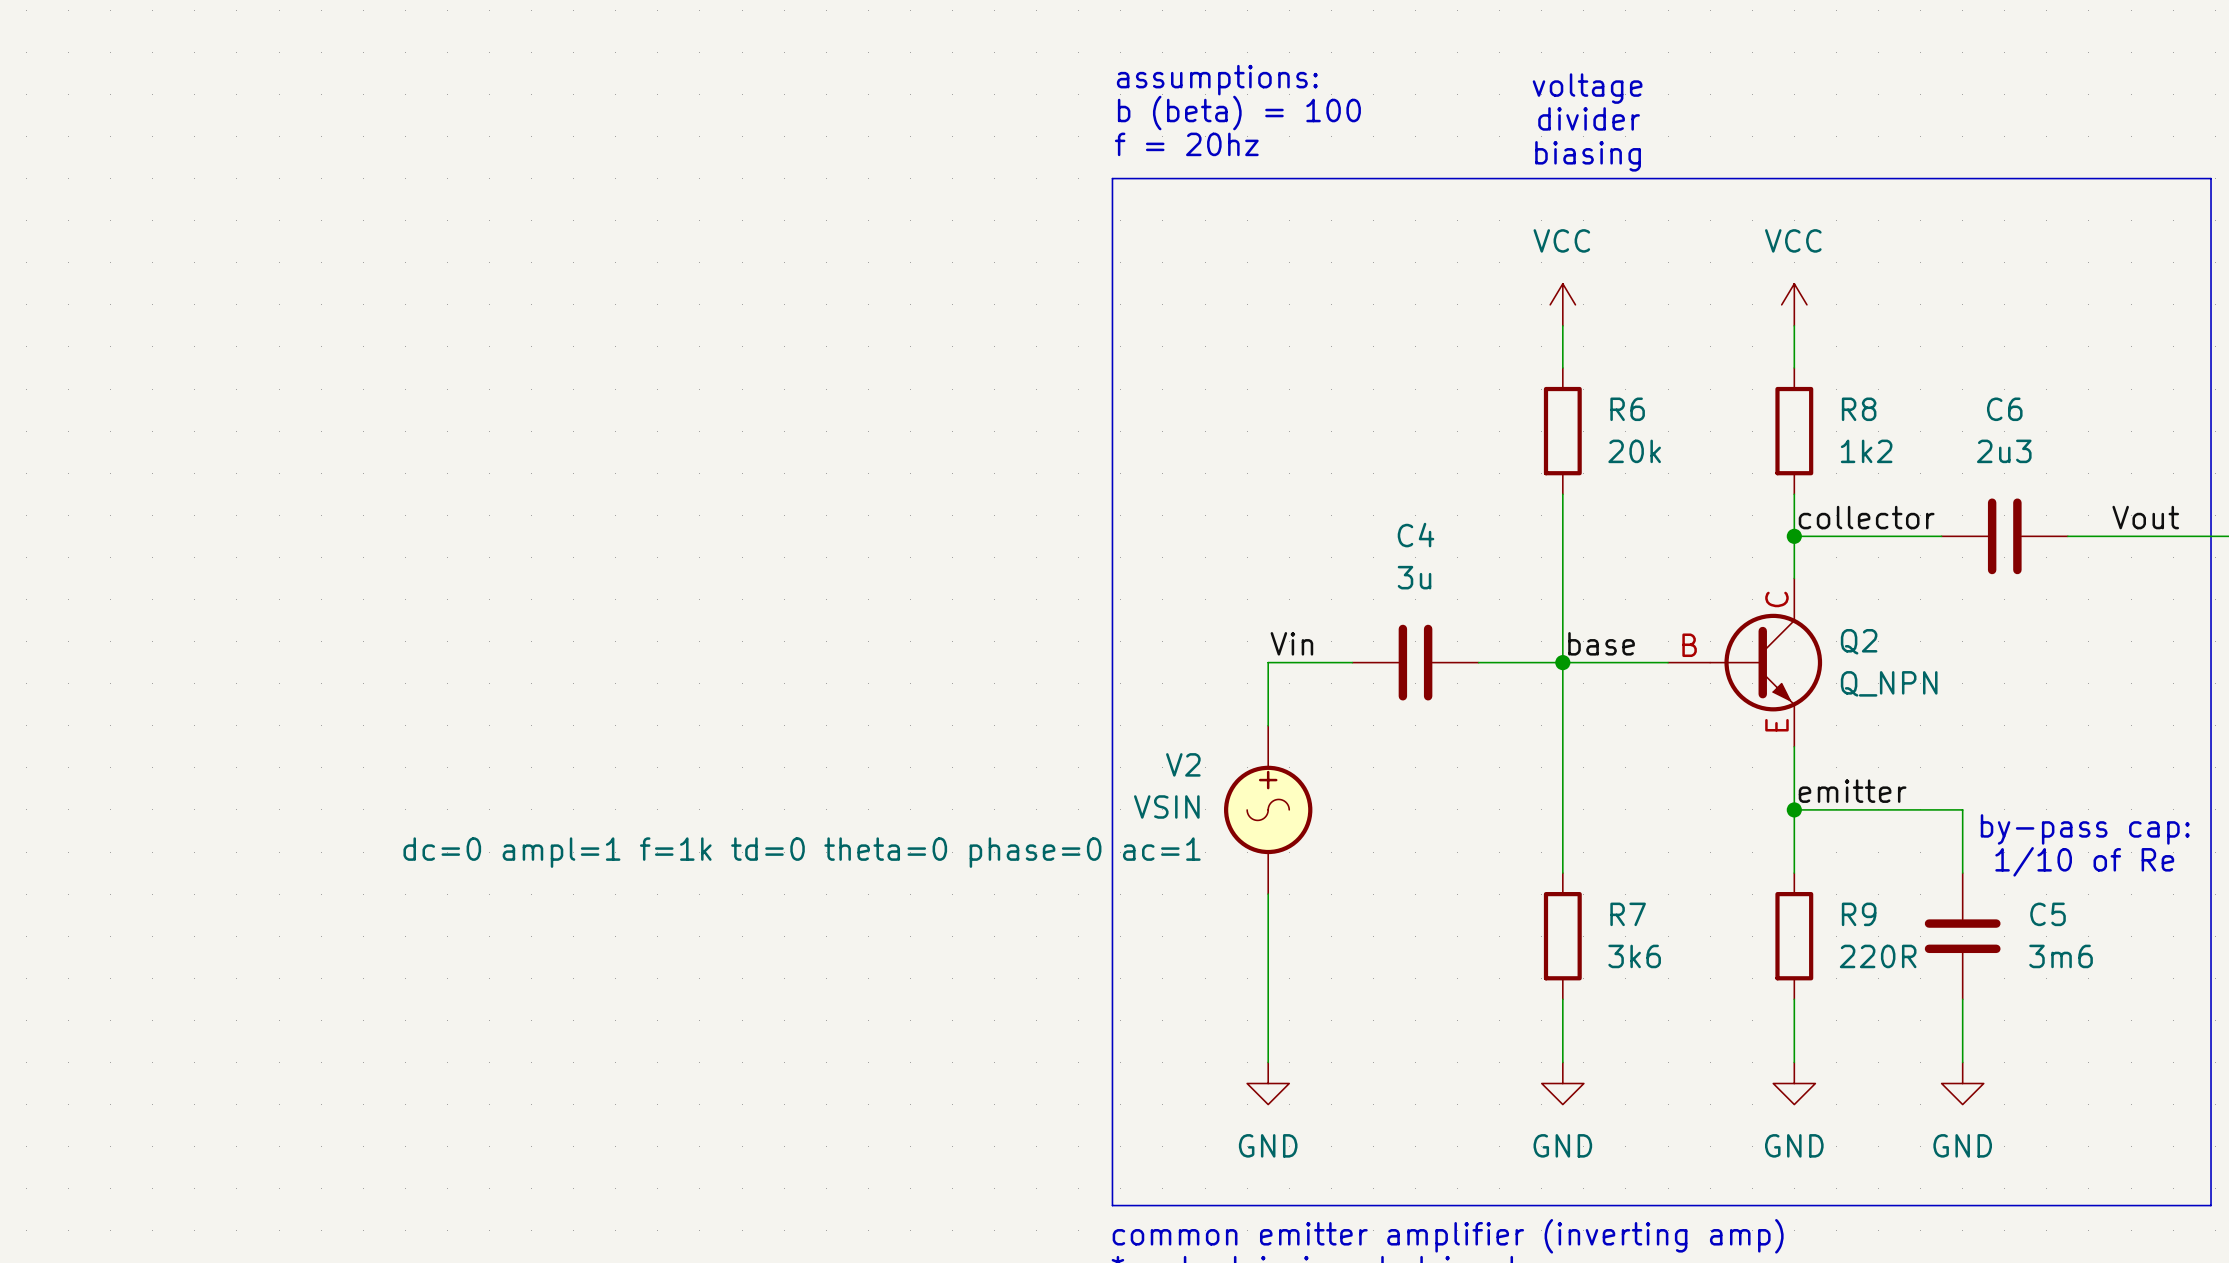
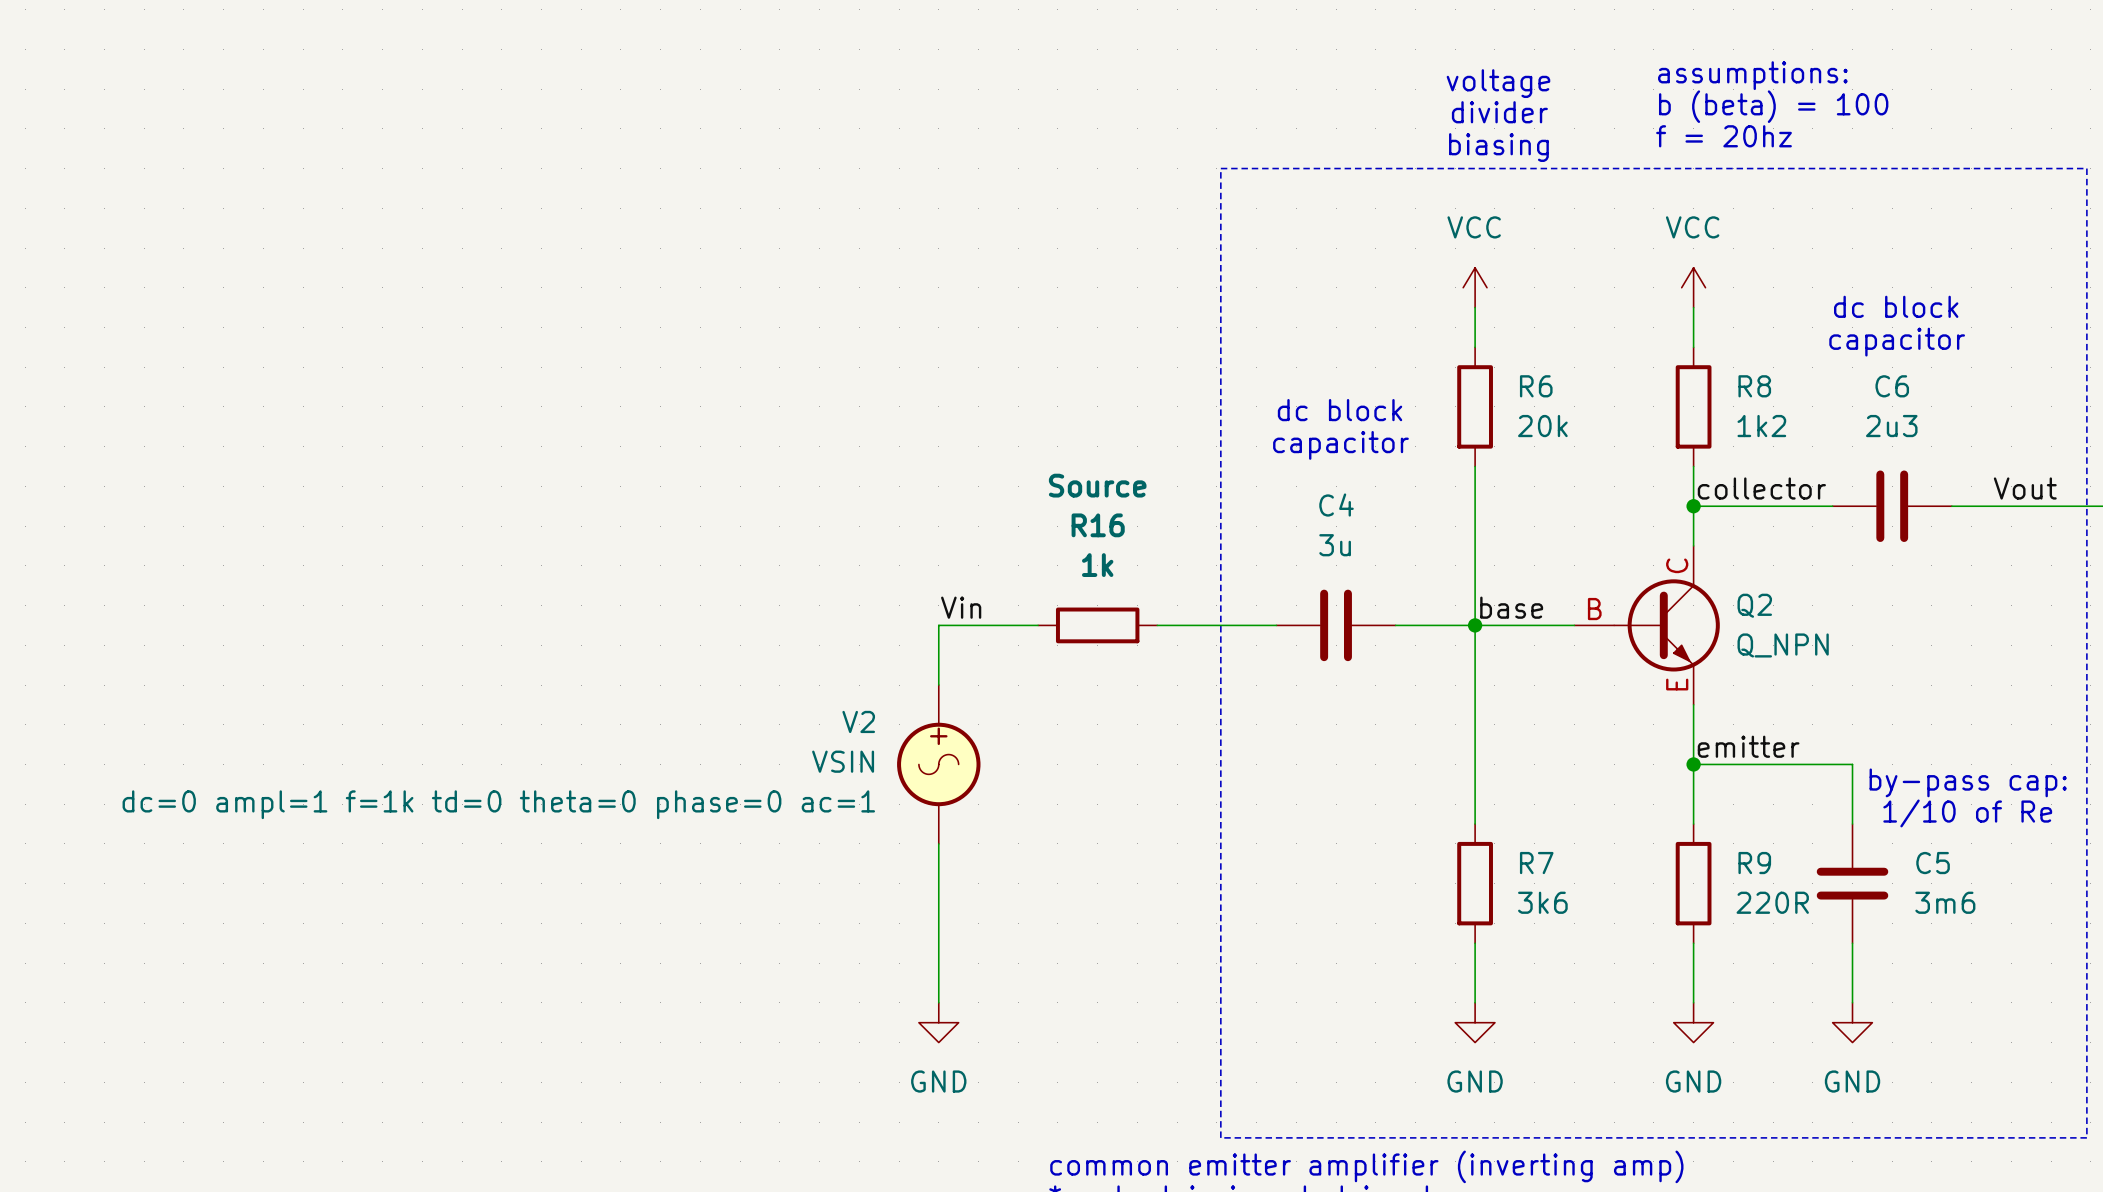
text: assumptions: (1217, 80) -> none
text: none -> assumptions: (1752, 75)
text: b (beta) = 100 (1239, 113) -> none
text: none -> b (beta) = 100 (1773, 106)
text: f = 20hz (1186, 144) -> none
text: none -> f = 20hz (1724, 136)
line: (1112, 178) (2211, 178) (2211, 1205) (1112, 1205) (1112, 178) -> (1220, 168) (1220, 1137) (2086, 1137) (2086, 168) (1220, 168)
text: none -> dc block (1896, 306)
text: none -> capacitor (1897, 342)
text: none -> dc block (1340, 410)
text: none -> capacitor (1340, 445)
label position: Vin (1291, 643) -> Vin (961, 607)
wire: none -> (1038, 625) (938, 625) (938, 685)
R16: none -> 1k (1097, 625)
wire: (1268, 662) (1268, 725) -> (1197, 625) (1157, 625)
V2 position: (1268, 809) -> (938, 764)
wire: (1268, 894) (1268, 1062) -> (938, 843) (938, 1002)
power symbol position: GND (1268, 1083) -> GND (938, 1022)

